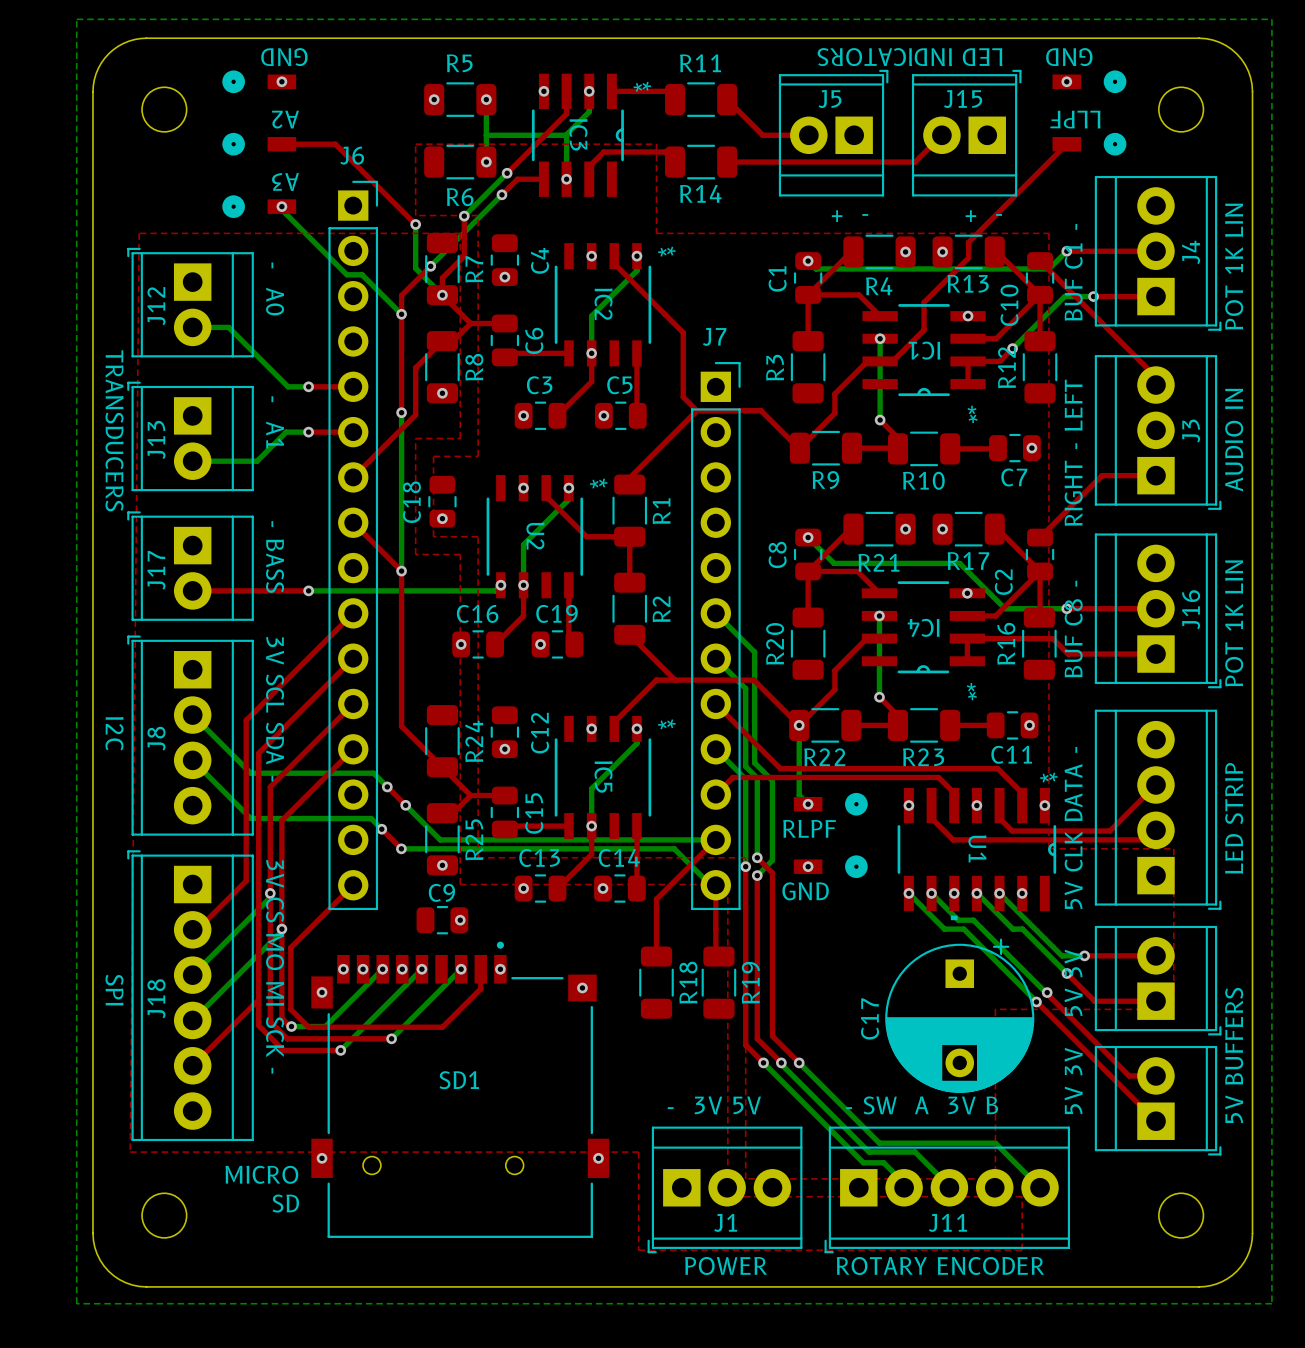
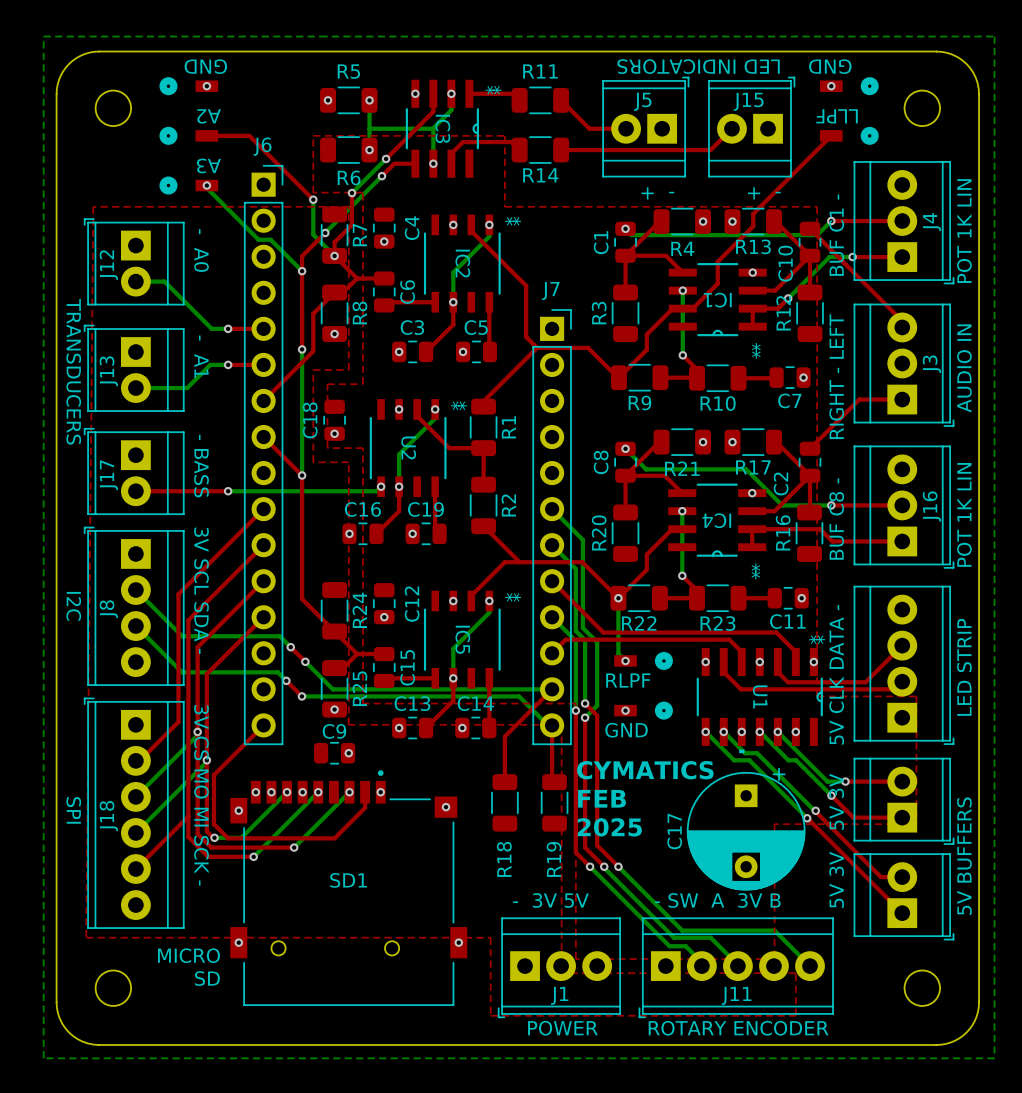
text: none -> CYMATICS (645, 770)
text: none -> FEB (602, 798)
R18 name position: R18 (688, 982) -> R18 (504, 859)
R19 name position: R19 (750, 982) -> R19 (554, 859)
text: none -> 2025 (609, 827)

